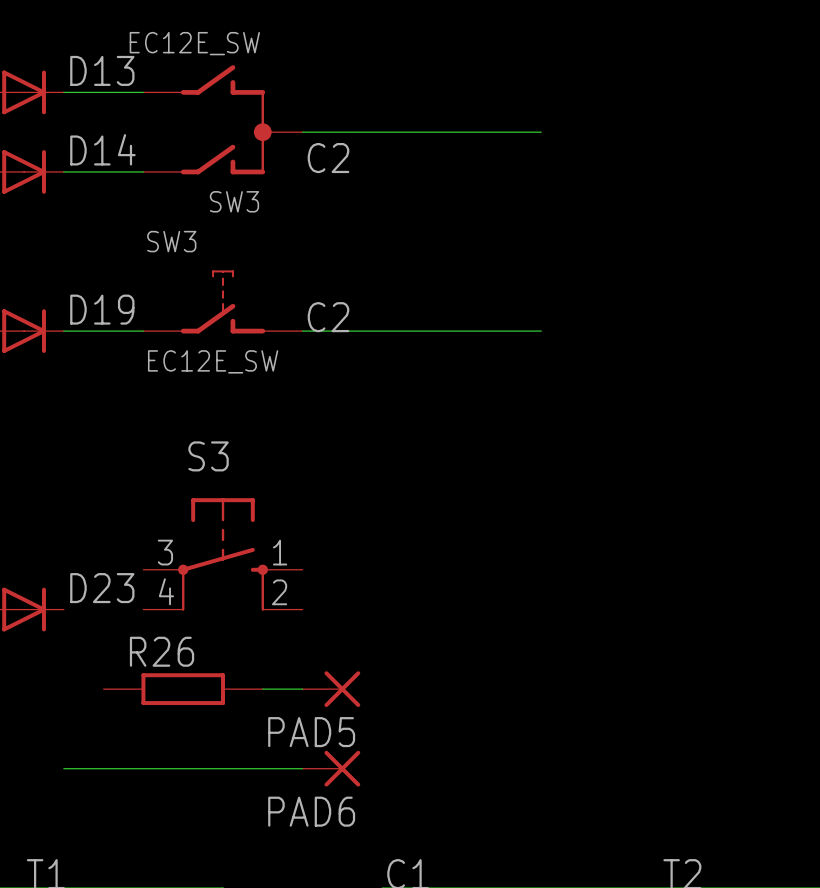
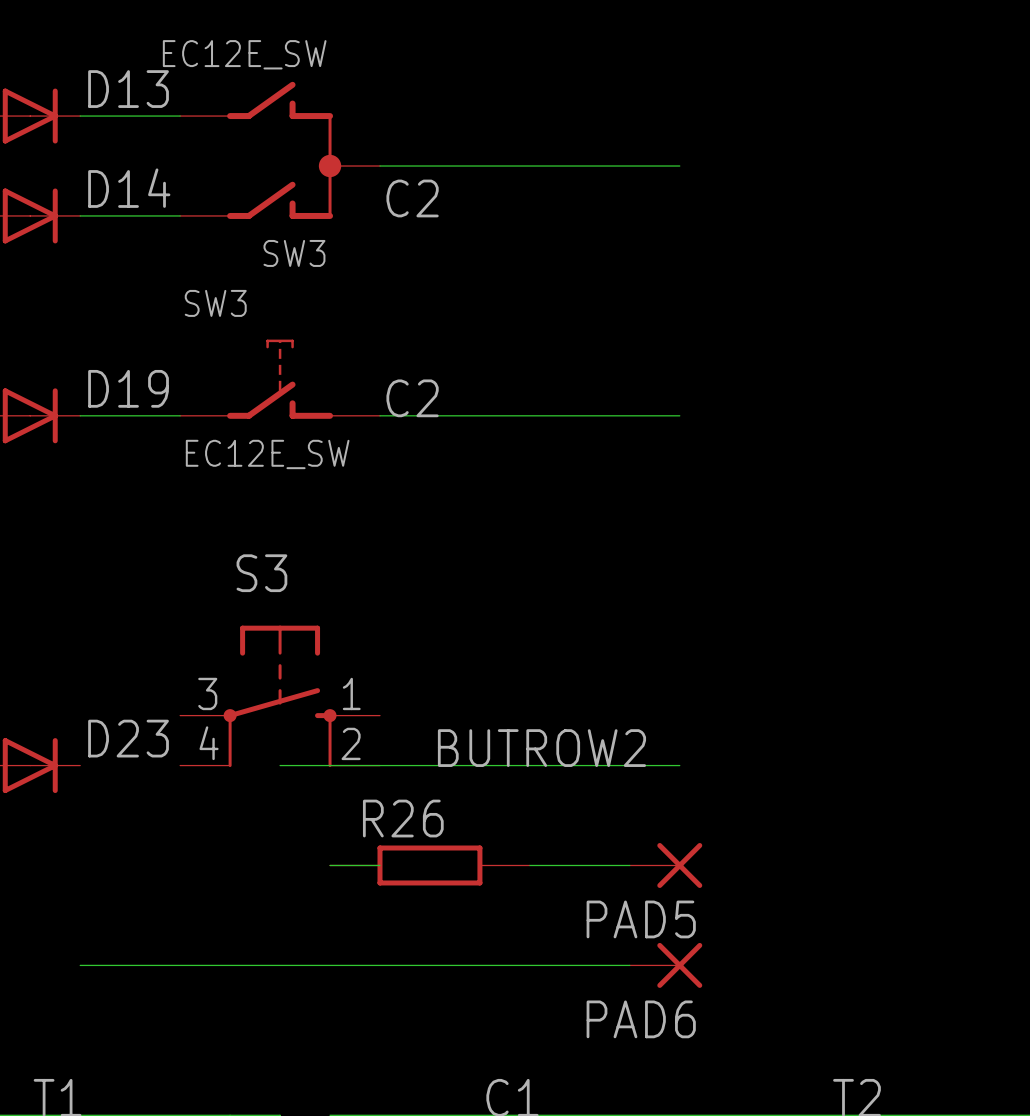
label: none -> BUTROW2 (541, 748)
wire: none -> (280, 765) (679, 765)
R26 position: (183, 689) -> (429, 865)
PAD5 position: (331, 689) -> (666, 865)
wire: none -> (529, 865) (629, 865)
wire: none -> (379, 965) (629, 965)
PAD6 position: (331, 768) -> (666, 965)
wire: none -> (330, 1115) (479, 1115)

